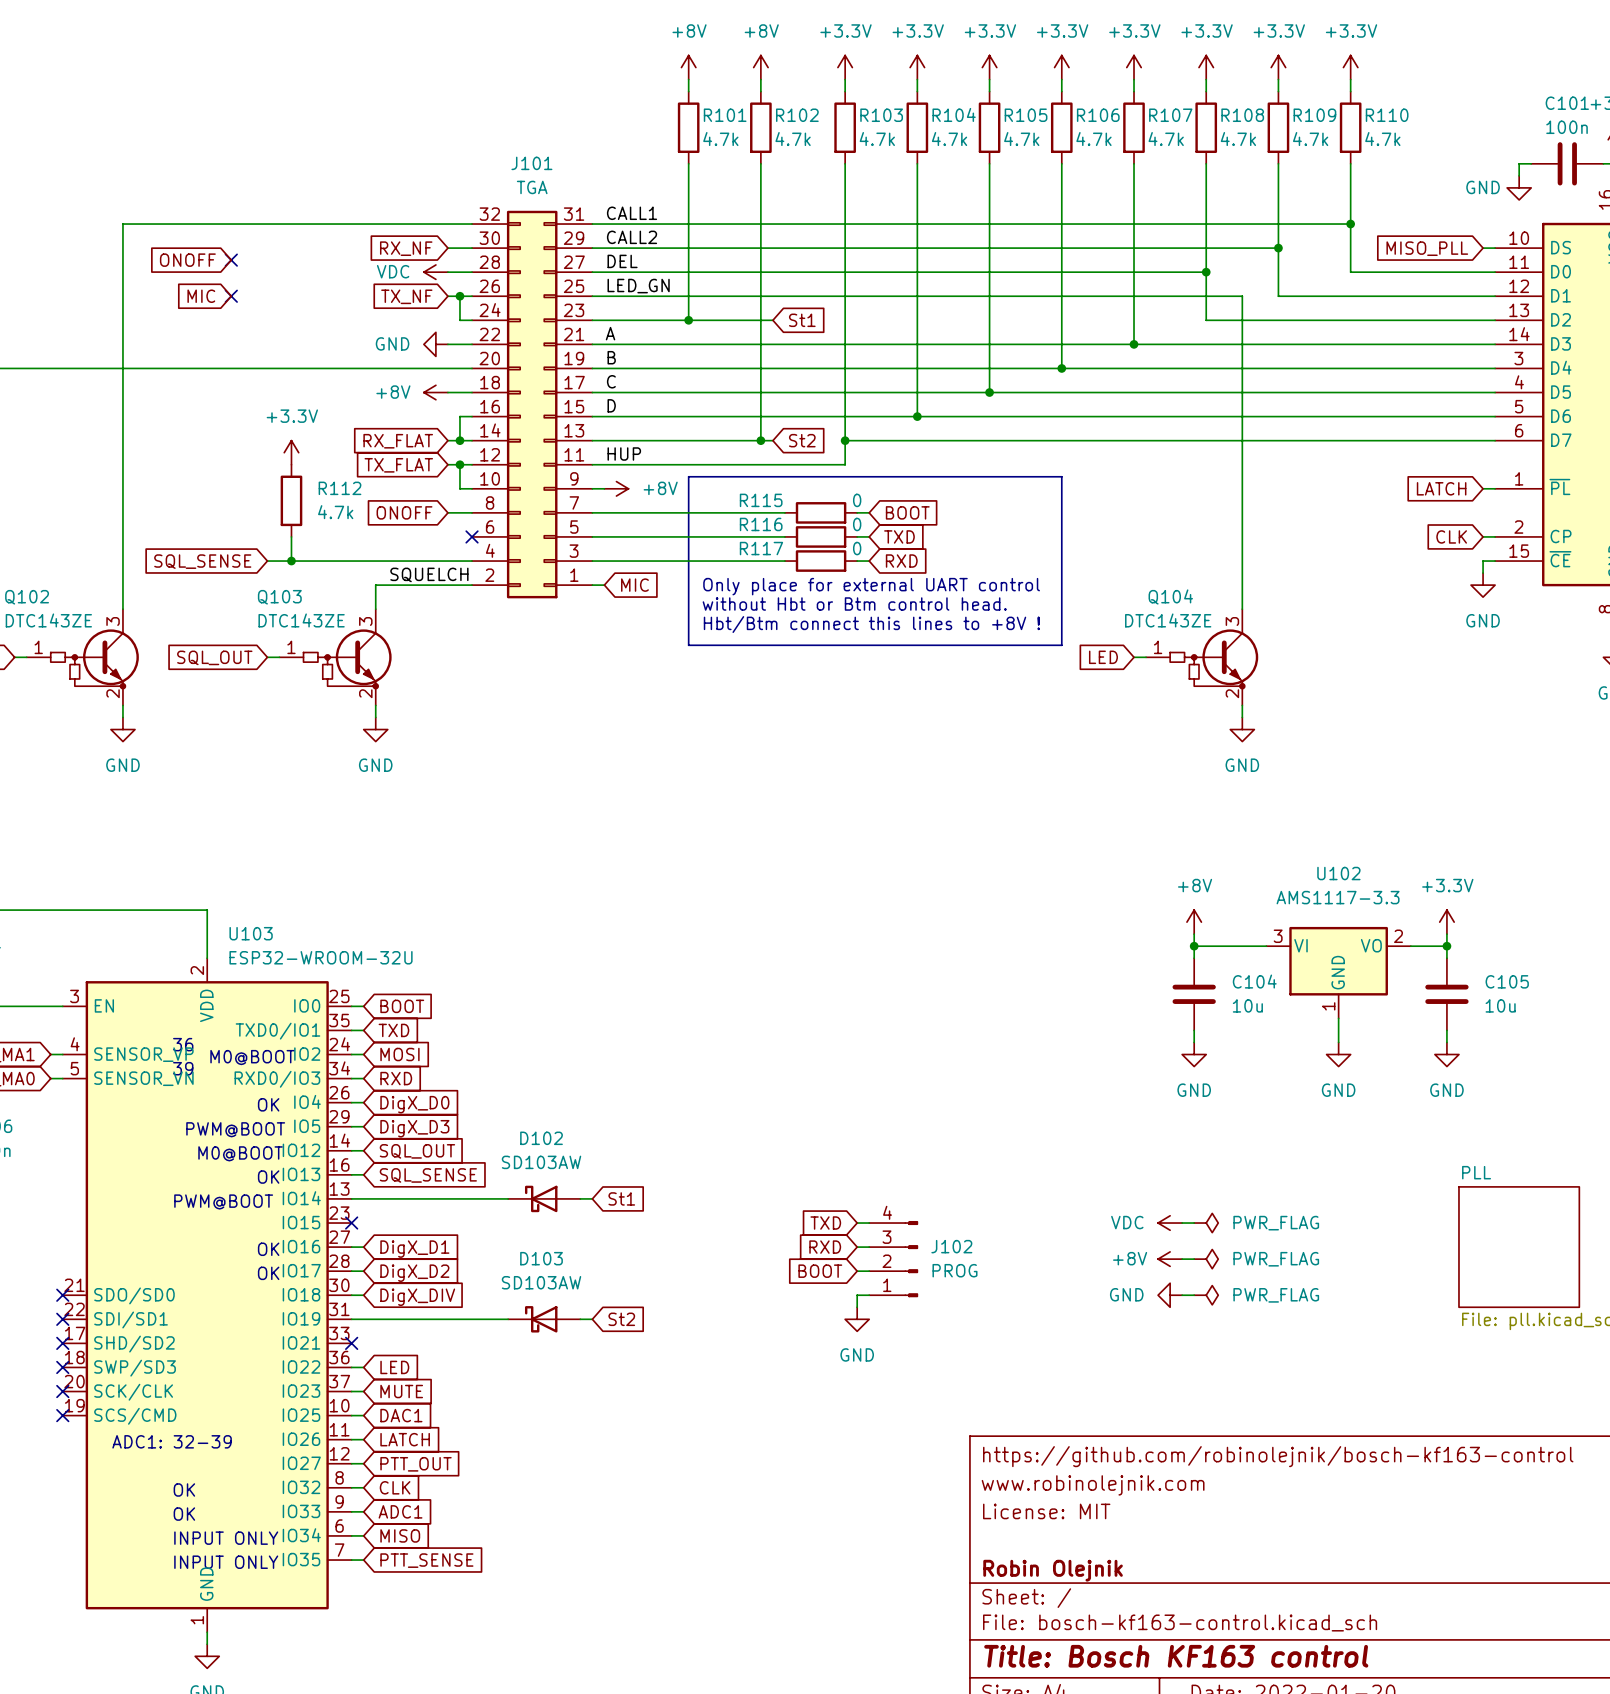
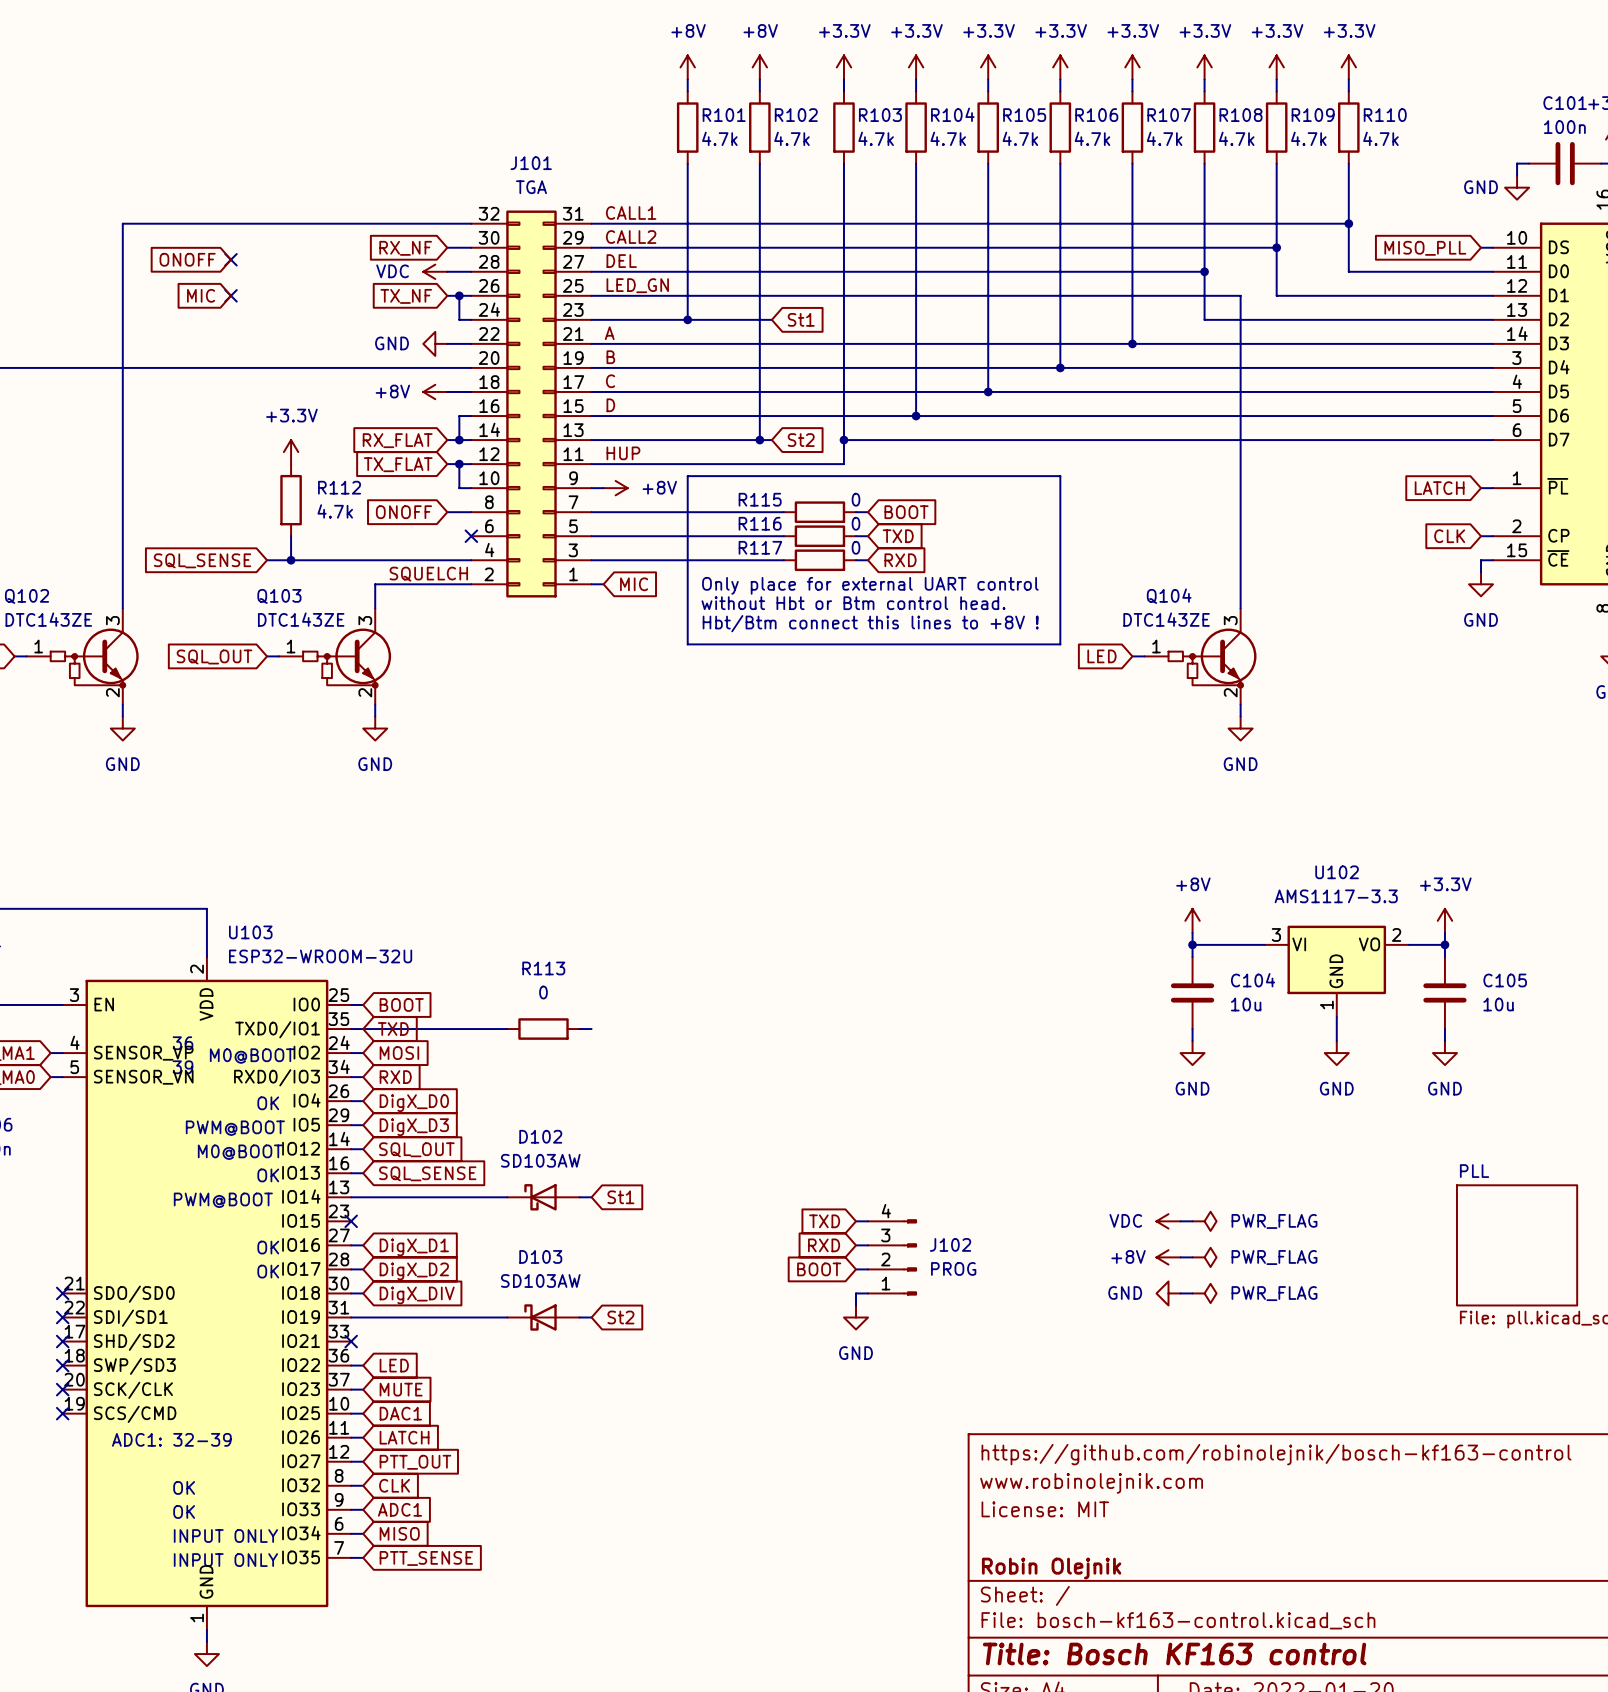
wire: none -> (363, 1029) (507, 1029)
R113: none -> 0 (543, 1029)
wire: none -> (579, 1029) (591, 1029)

